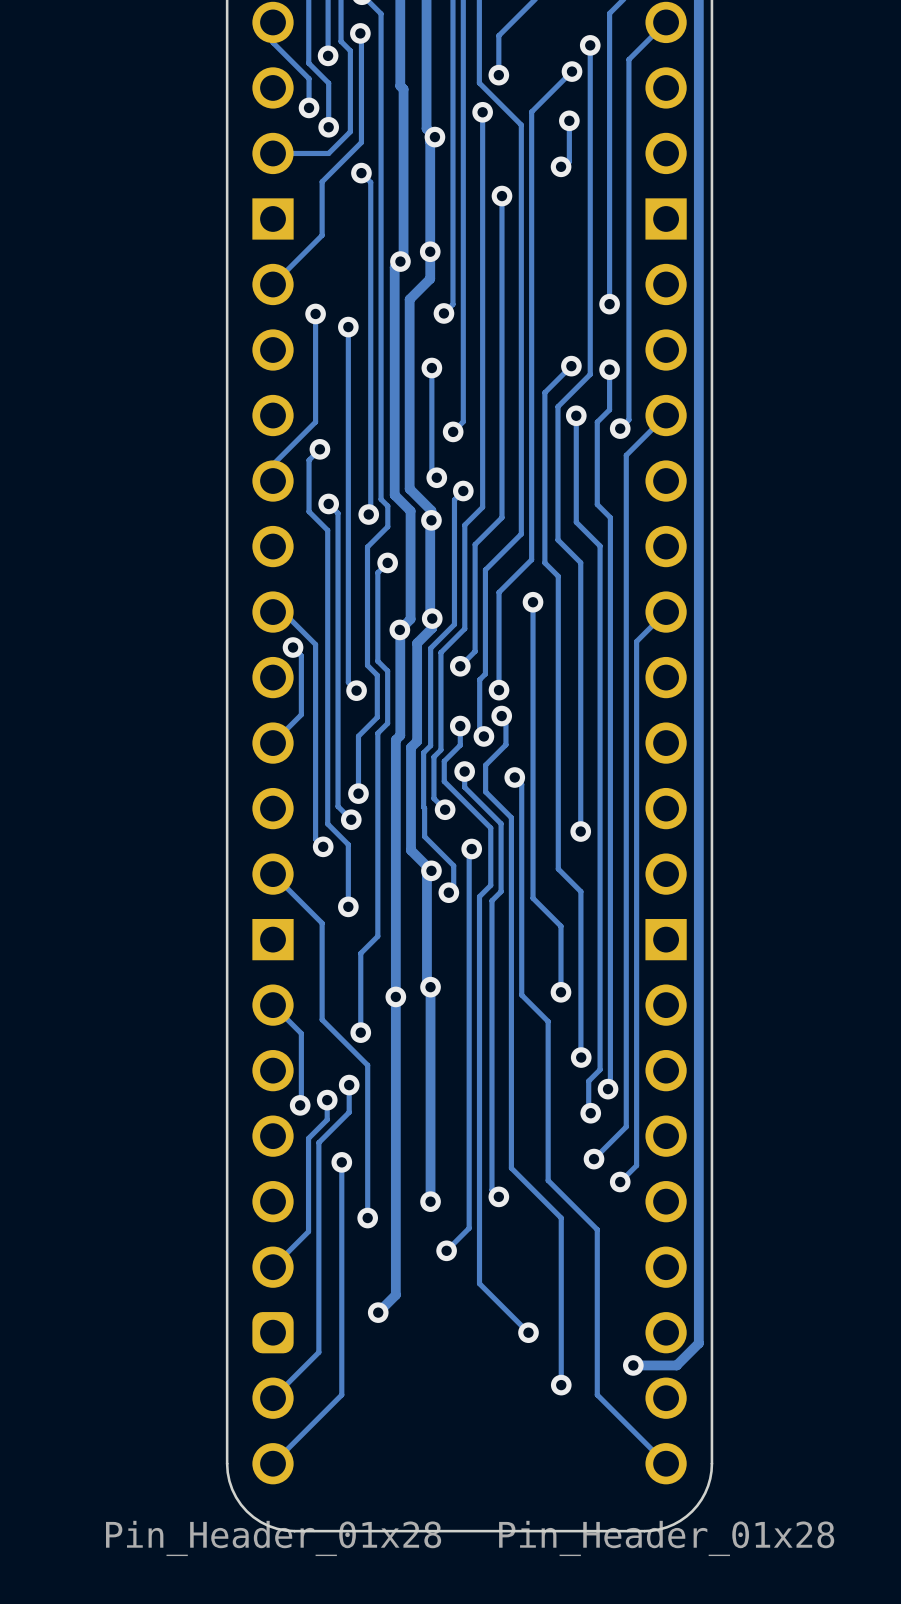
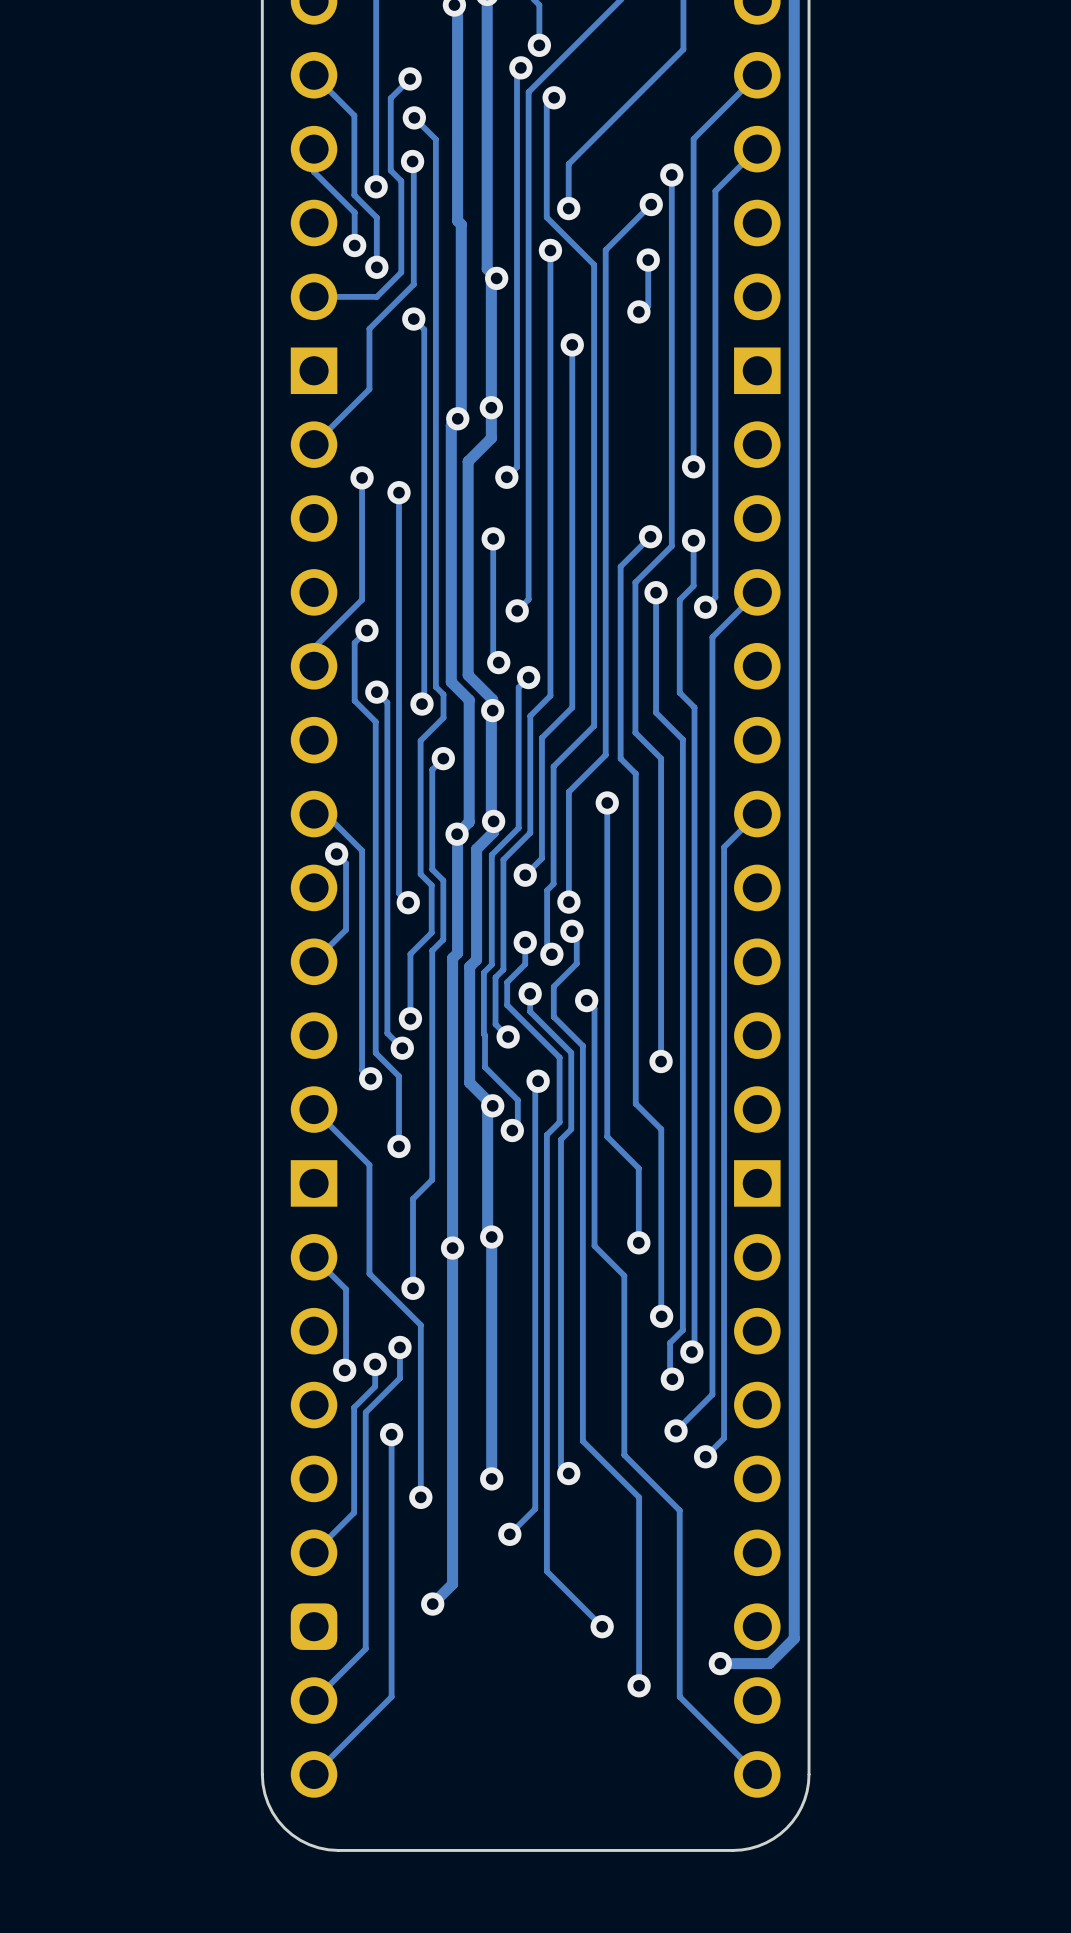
drawing: [106, 1520, 835, 1557] -> none

